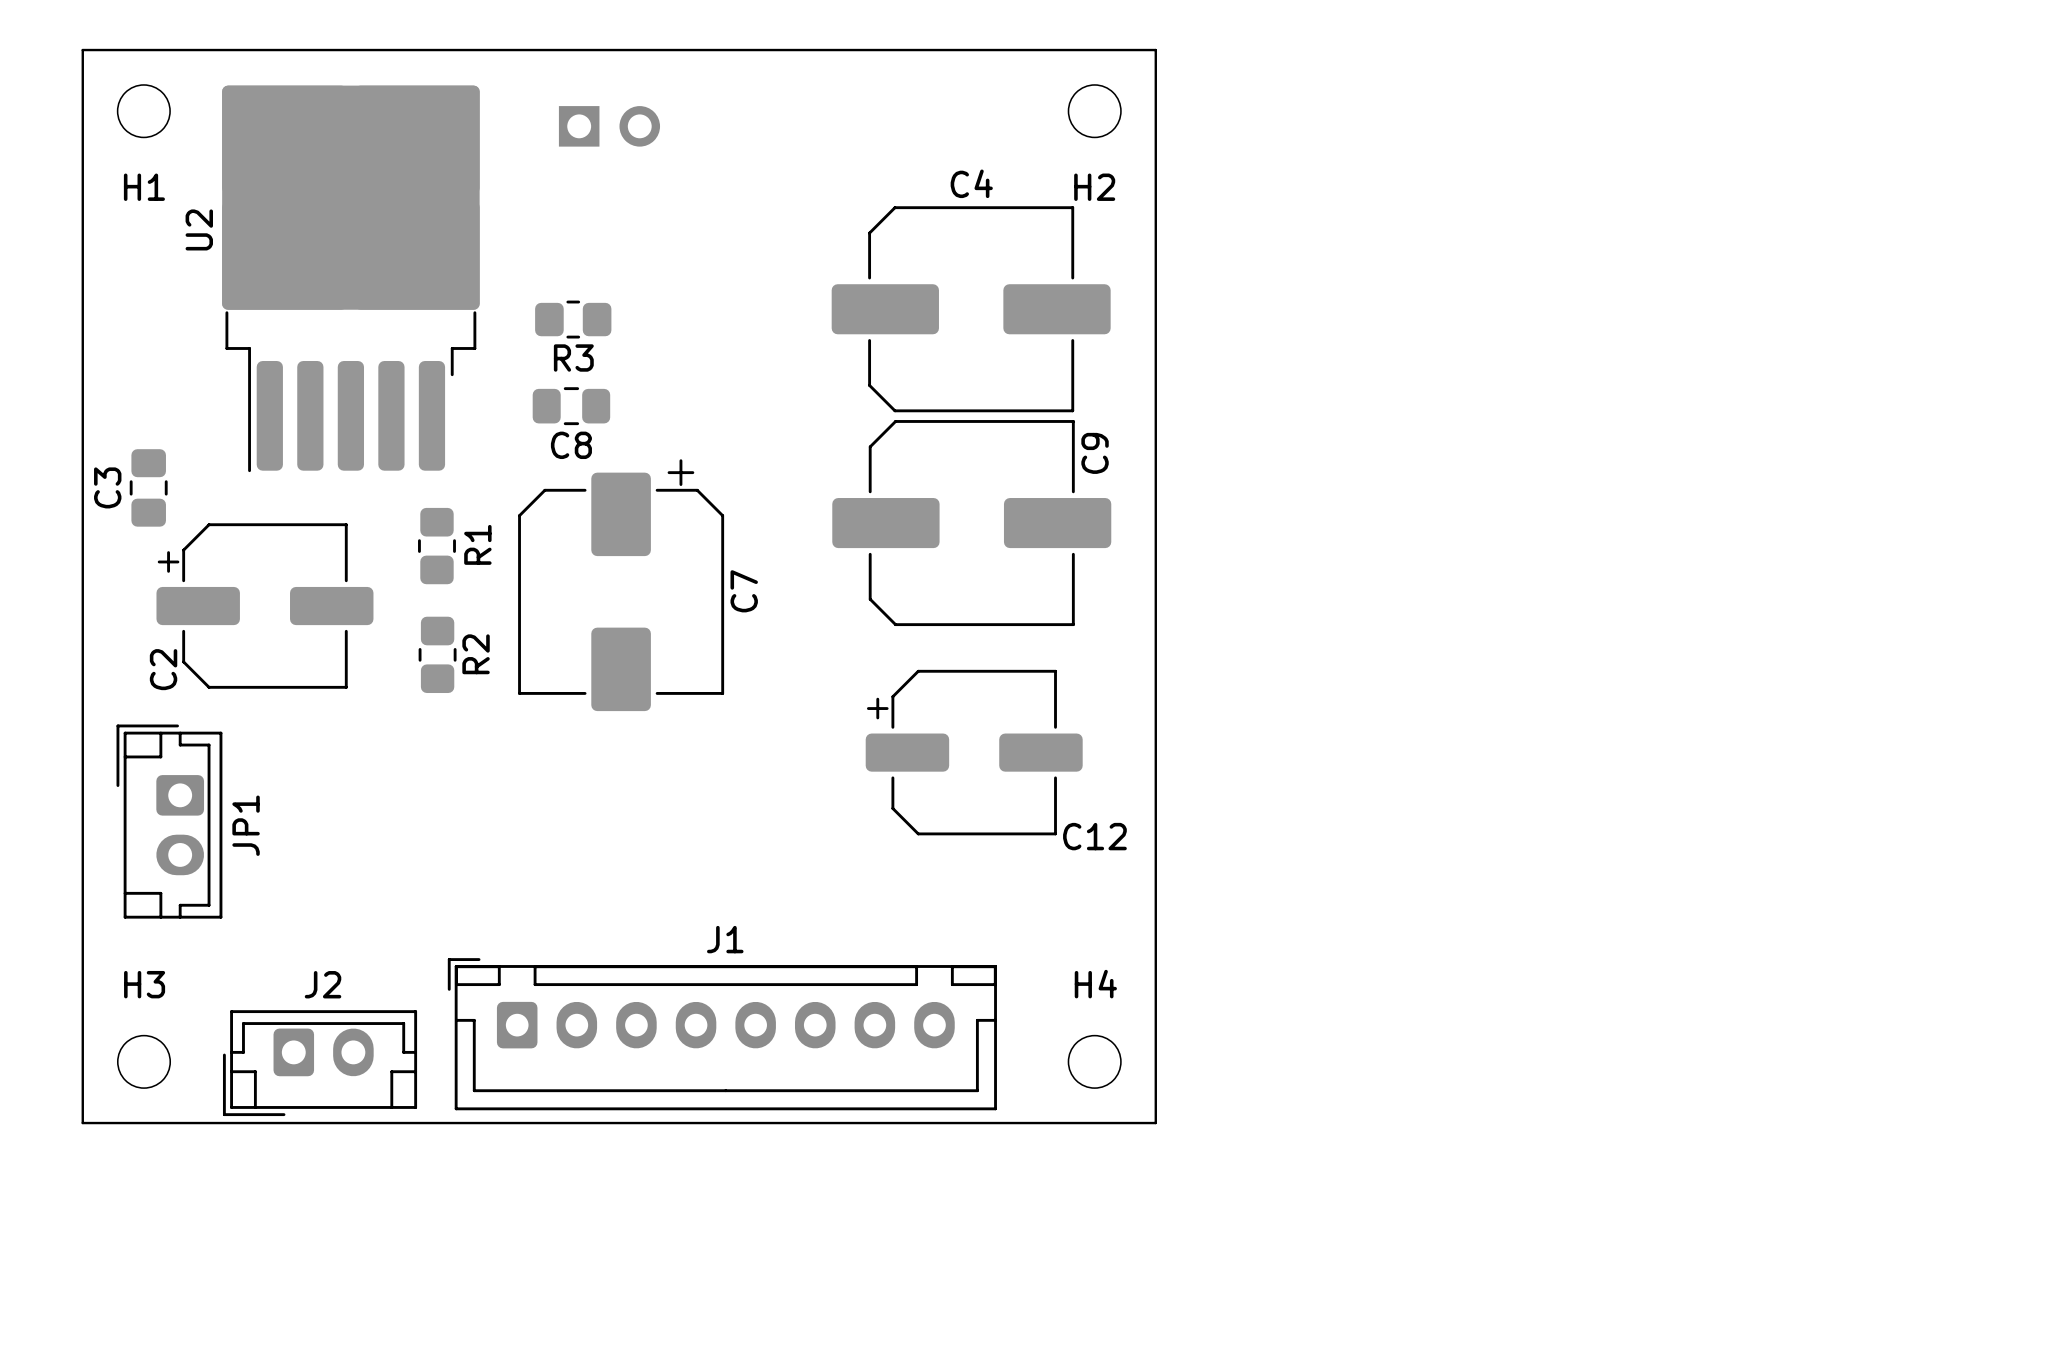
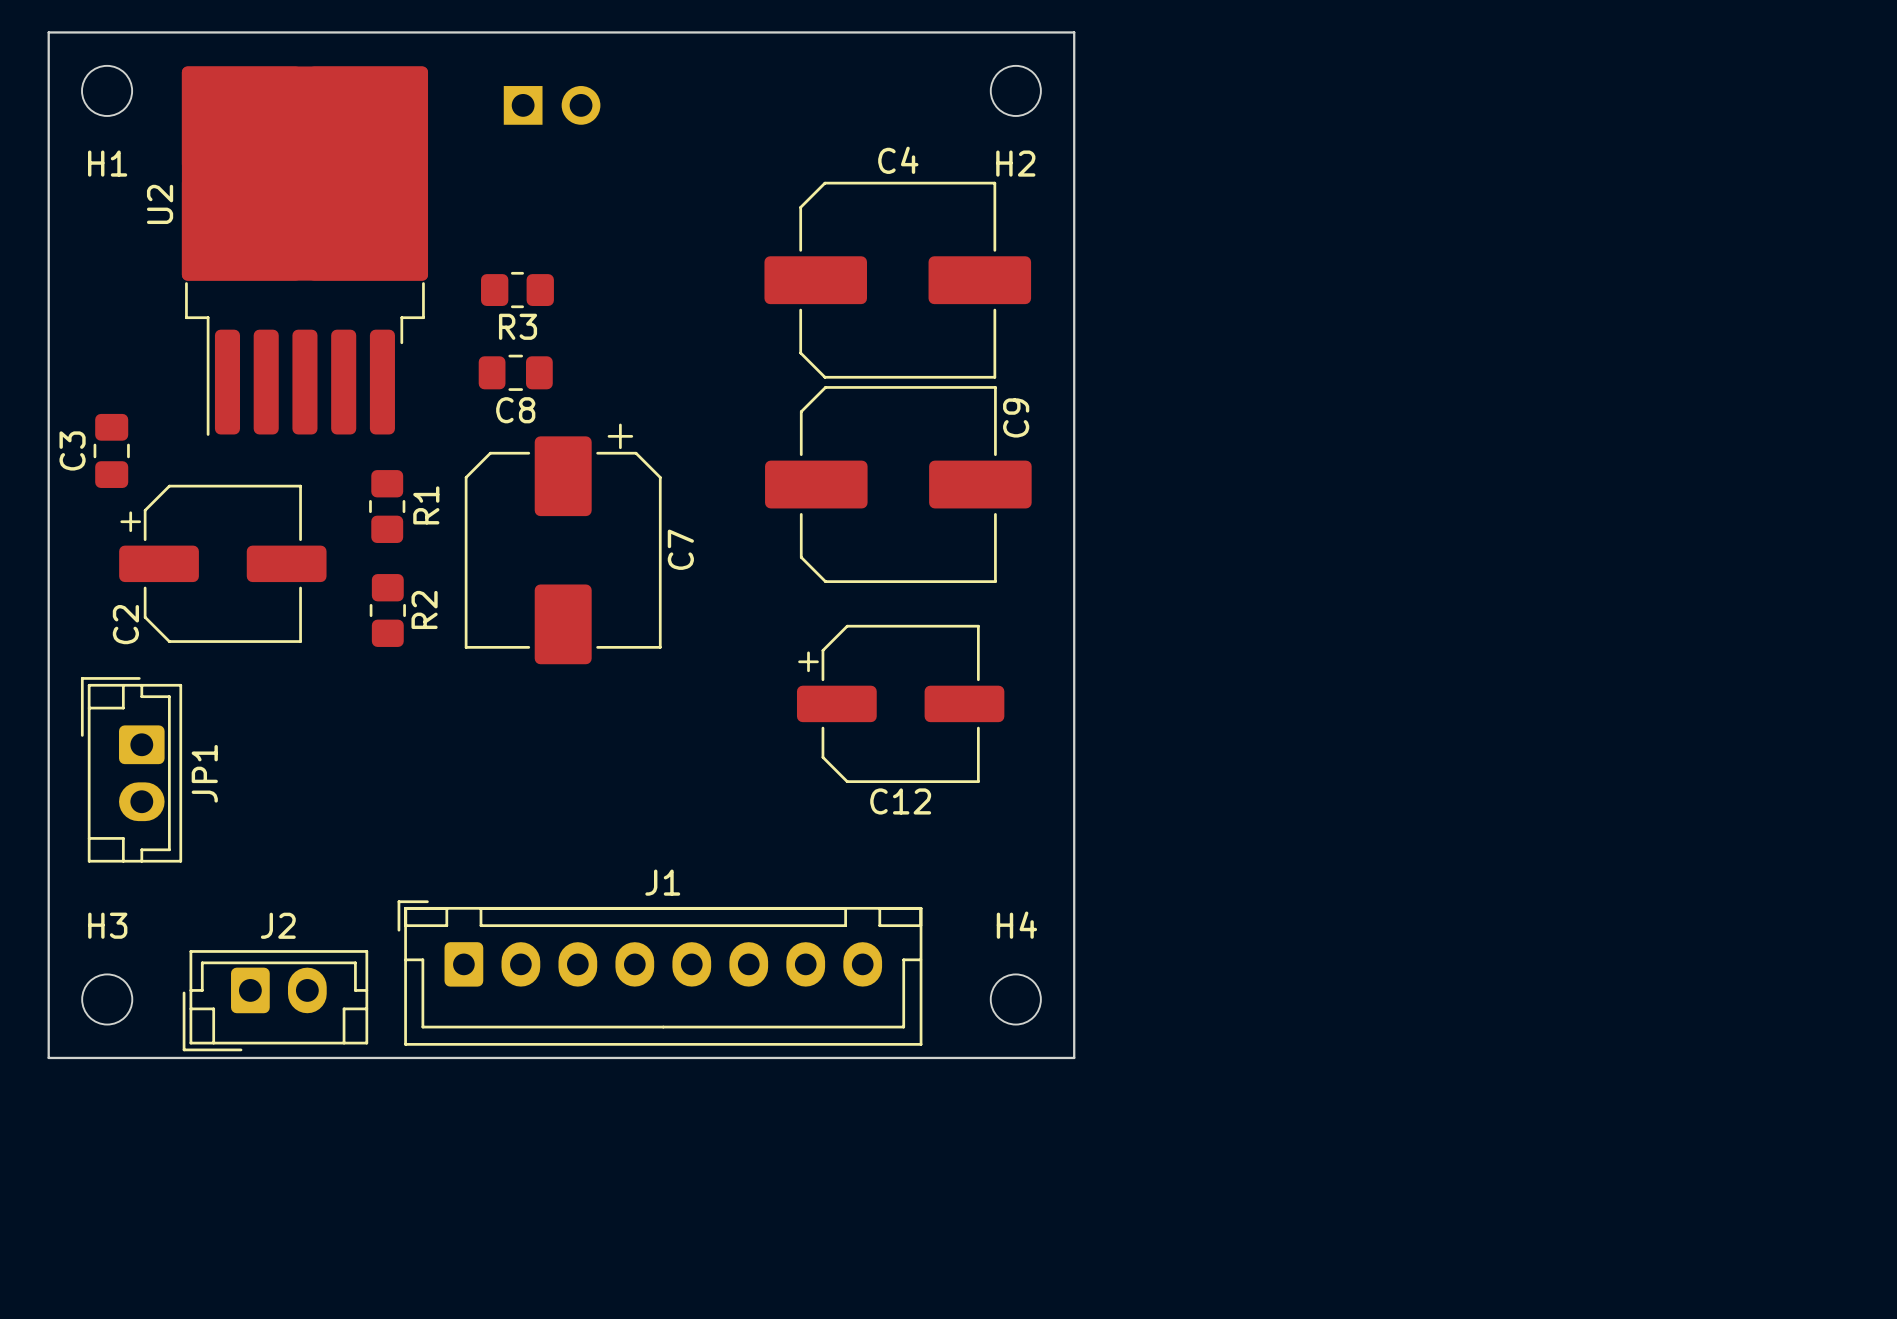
C12 name position: C12 (1094, 836) -> C12 (900, 801)

